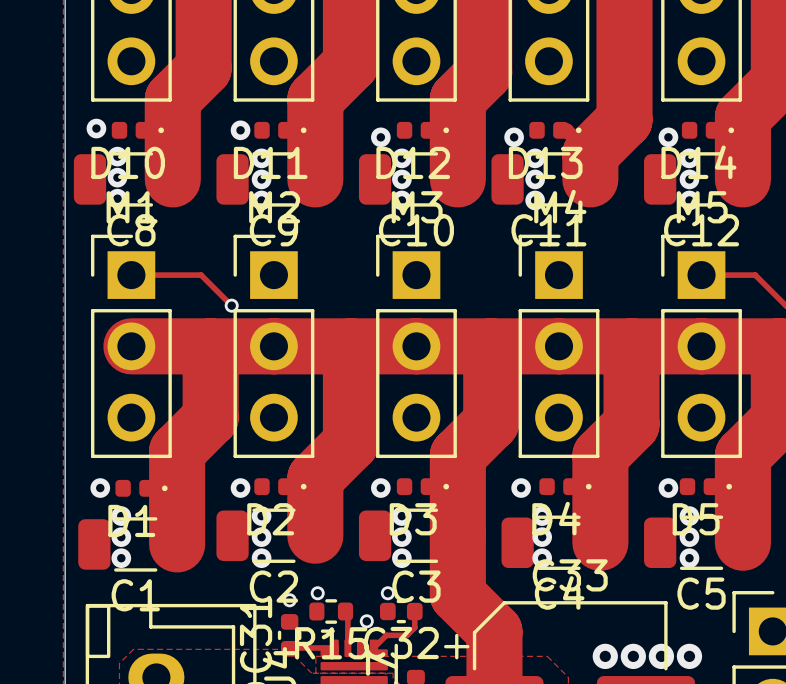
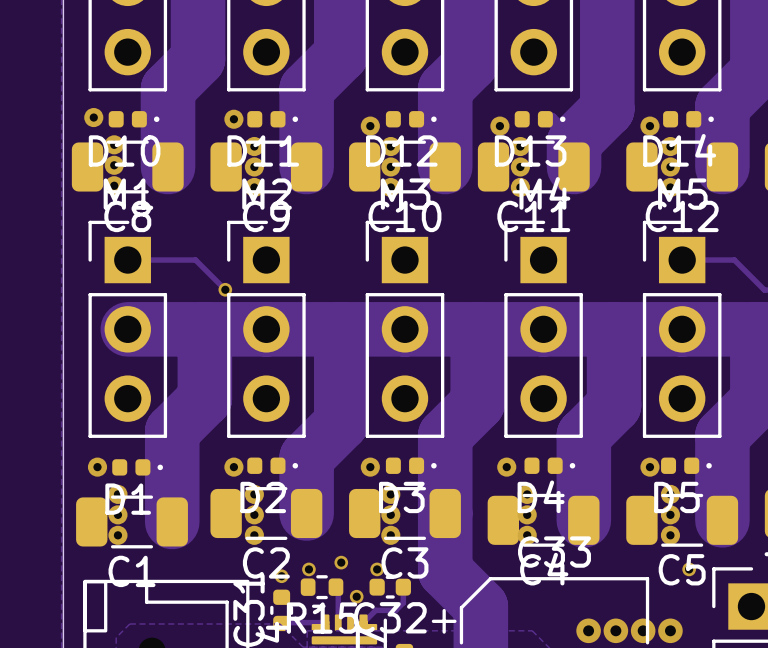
via: none -> (341, 562)
via: none -> (689, 569)

